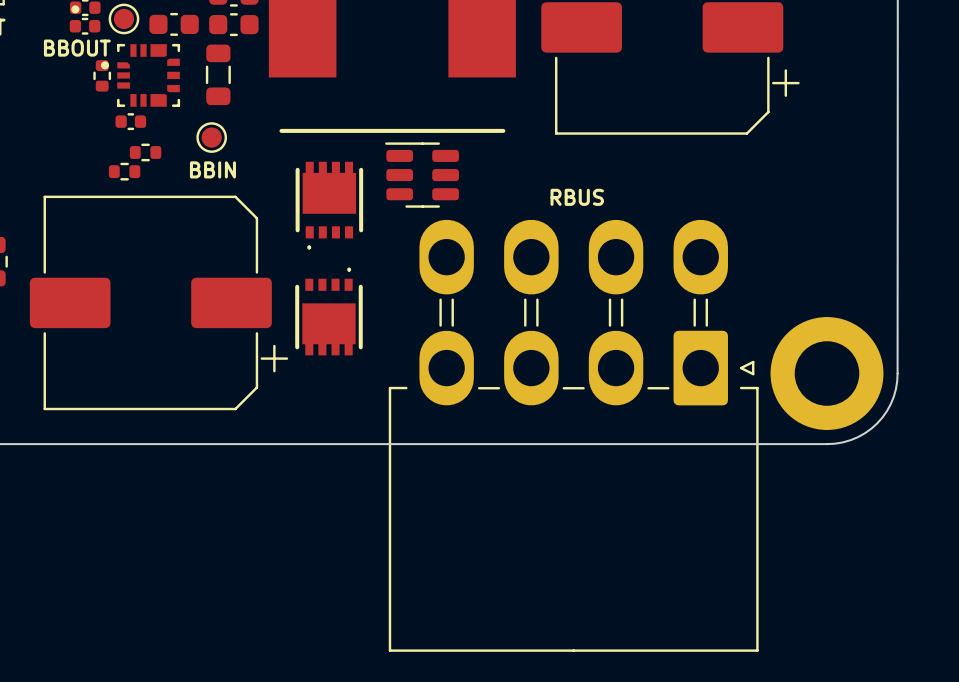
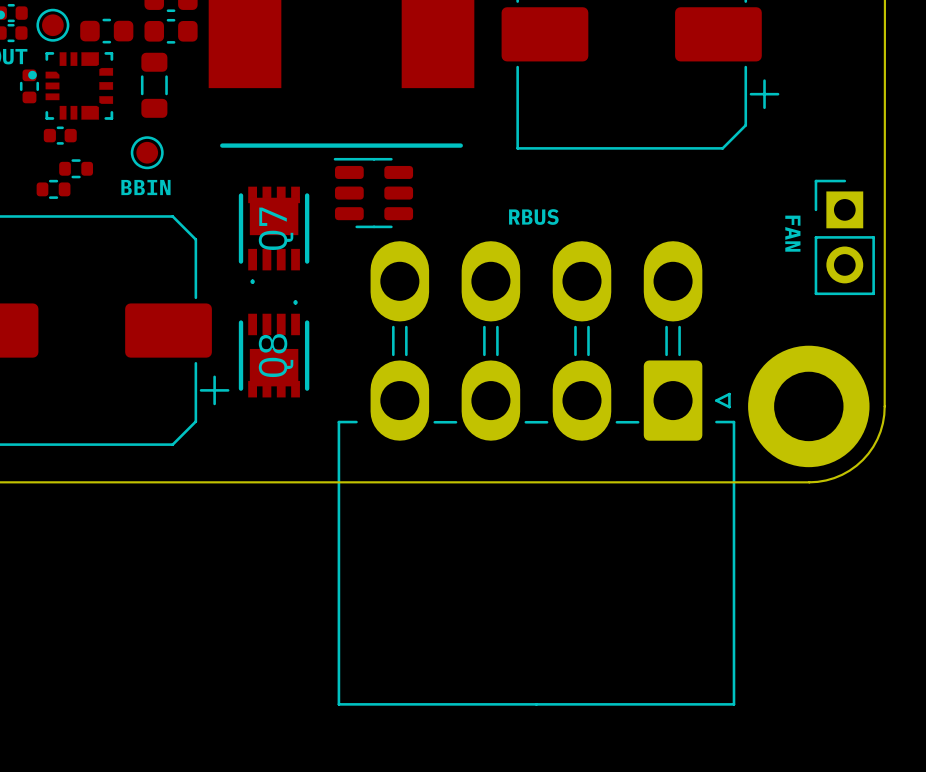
part: (329, 205) -> none
Q7: none -> (274, 235)
text: none -> FAN (792, 233)
part: none -> (844, 237)
part: (328, 311) -> none
Q8: none -> (274, 348)

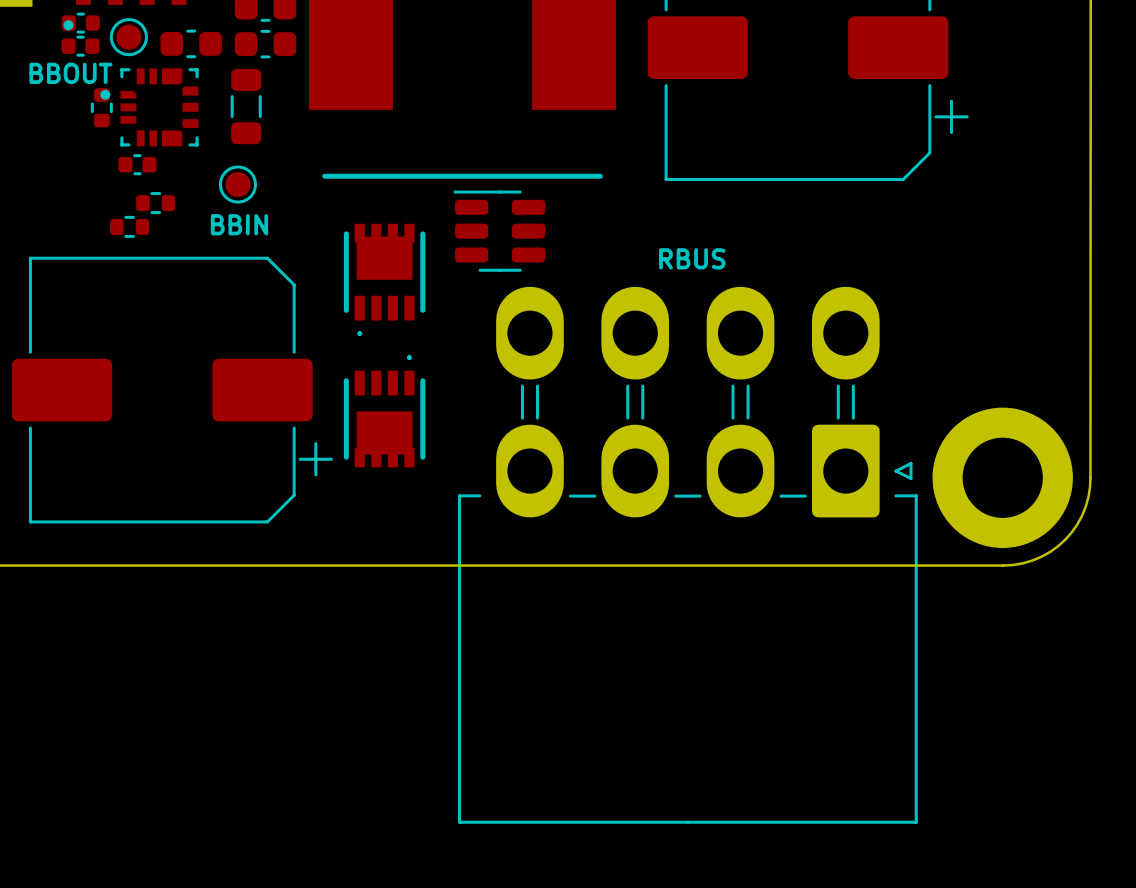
Q7 name: Q7 (276, 228) -> none
text: FAN (792, 233) -> none
part: (844, 237) -> none
Q8 name: Q8 (276, 355) -> none

